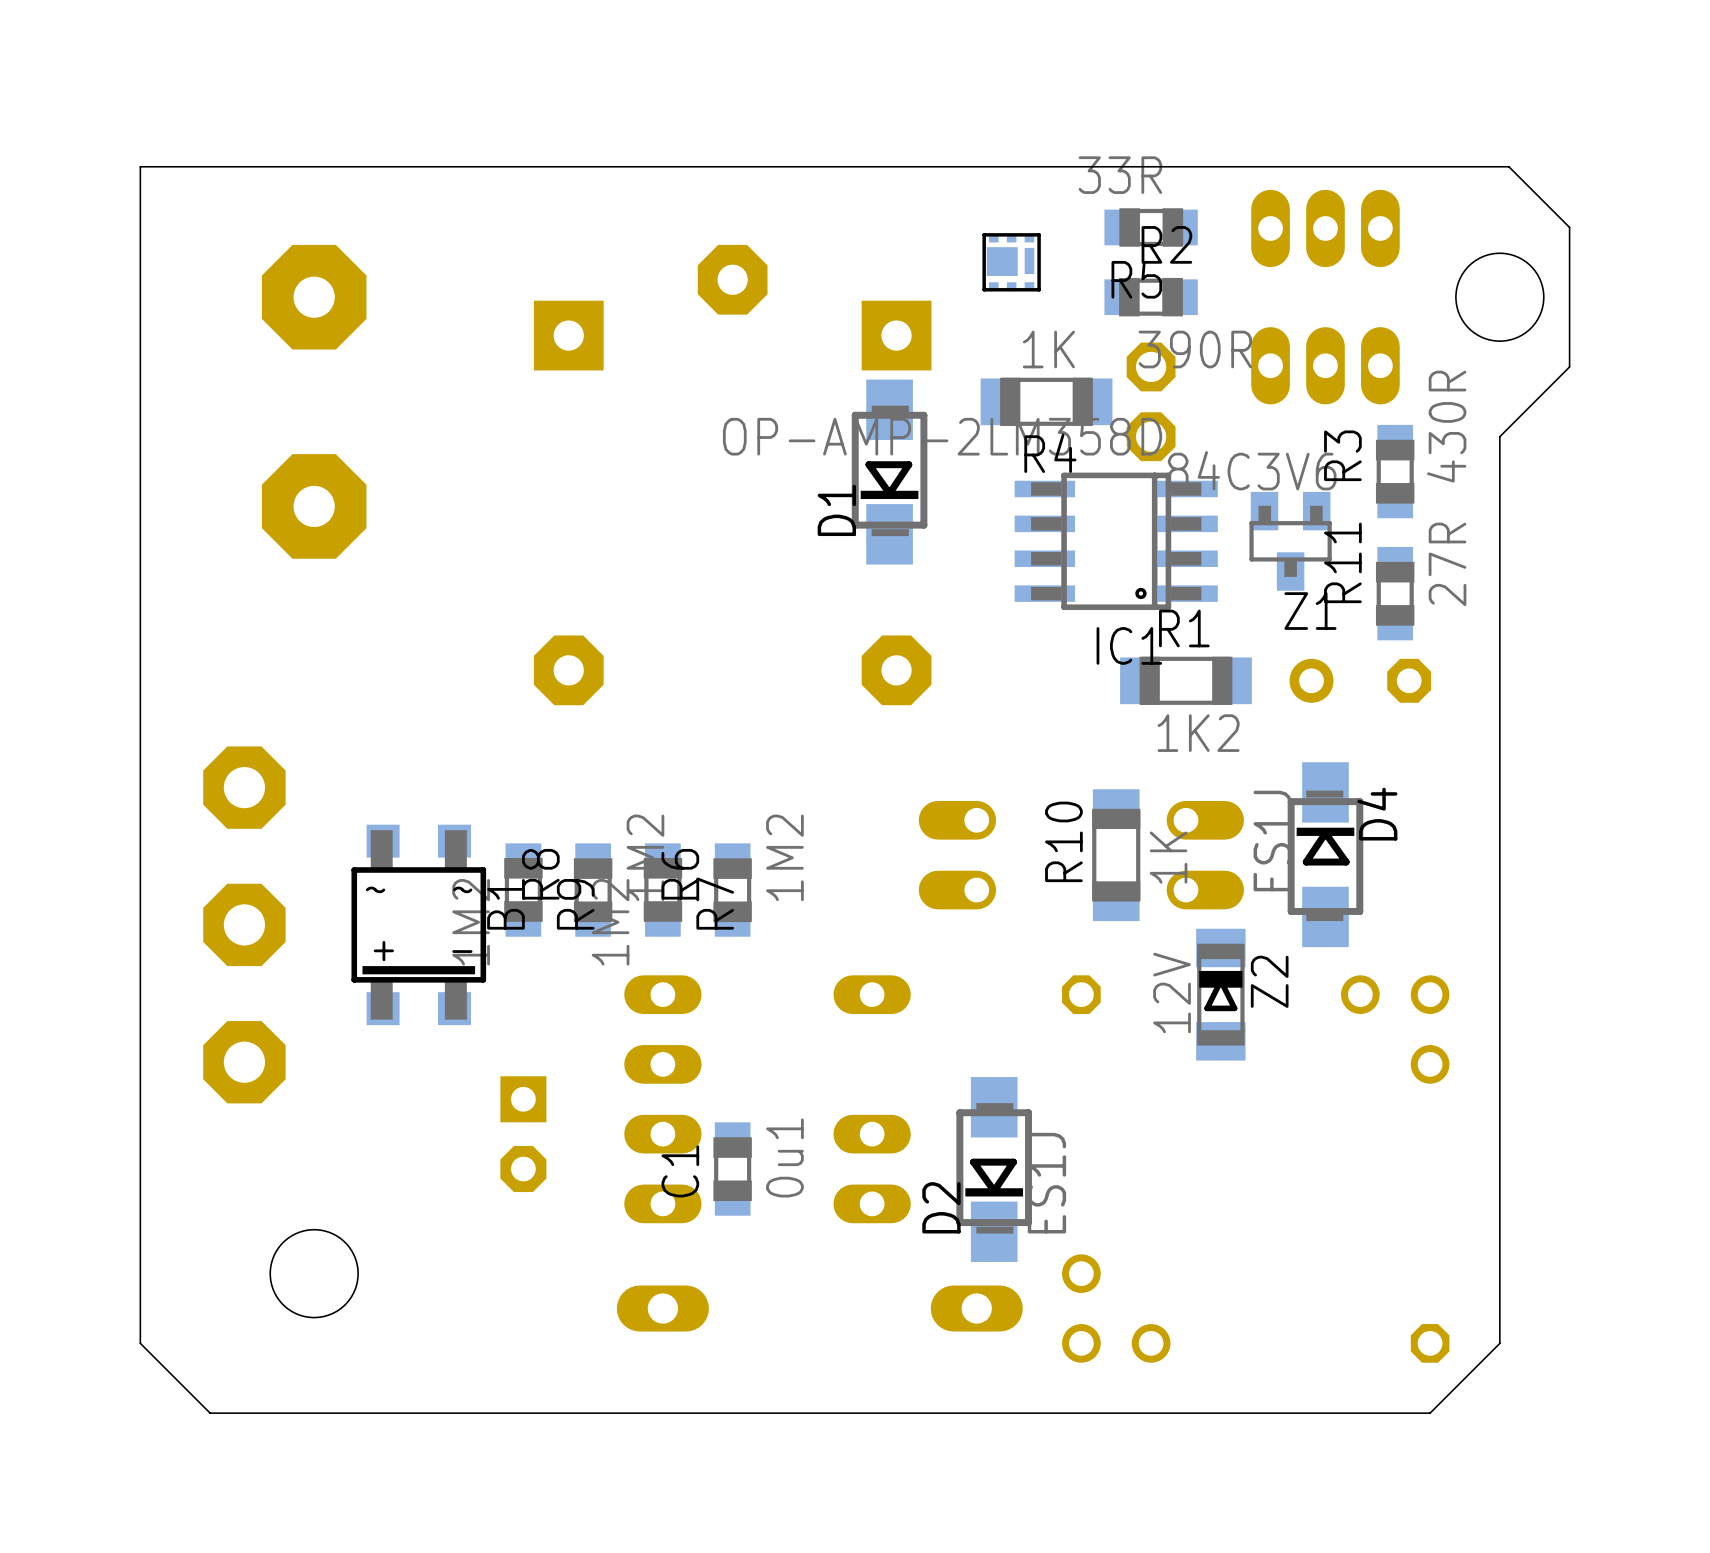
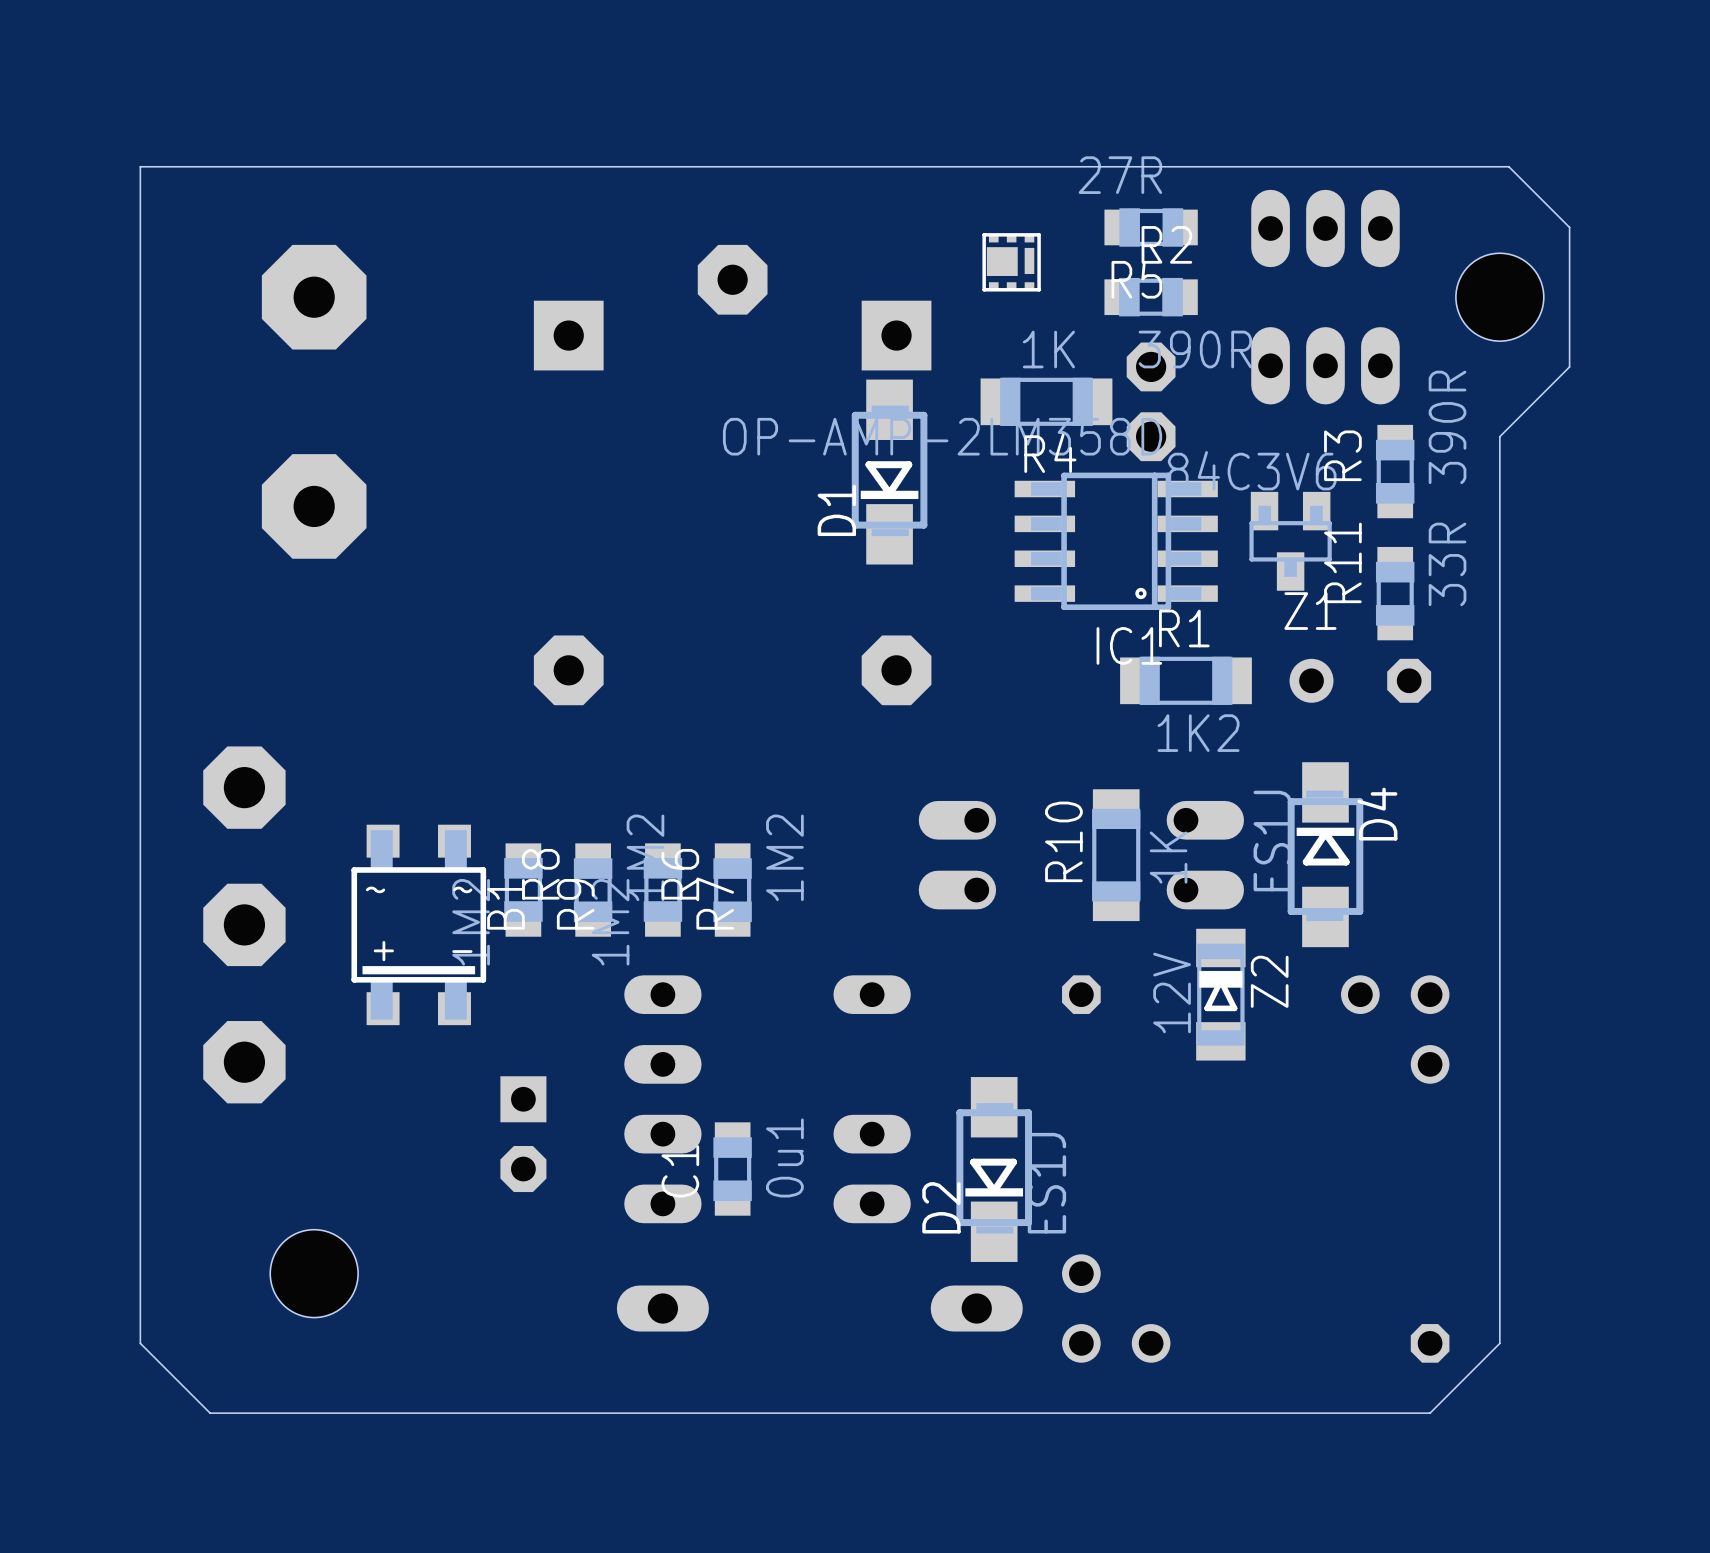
R5 value: 33R (1120, 175) -> 27R (1120, 175)
R3 value: 430R (1446, 426) -> 390R (1447, 427)
R11 value: 27R (1447, 564) -> 33R (1447, 564)

